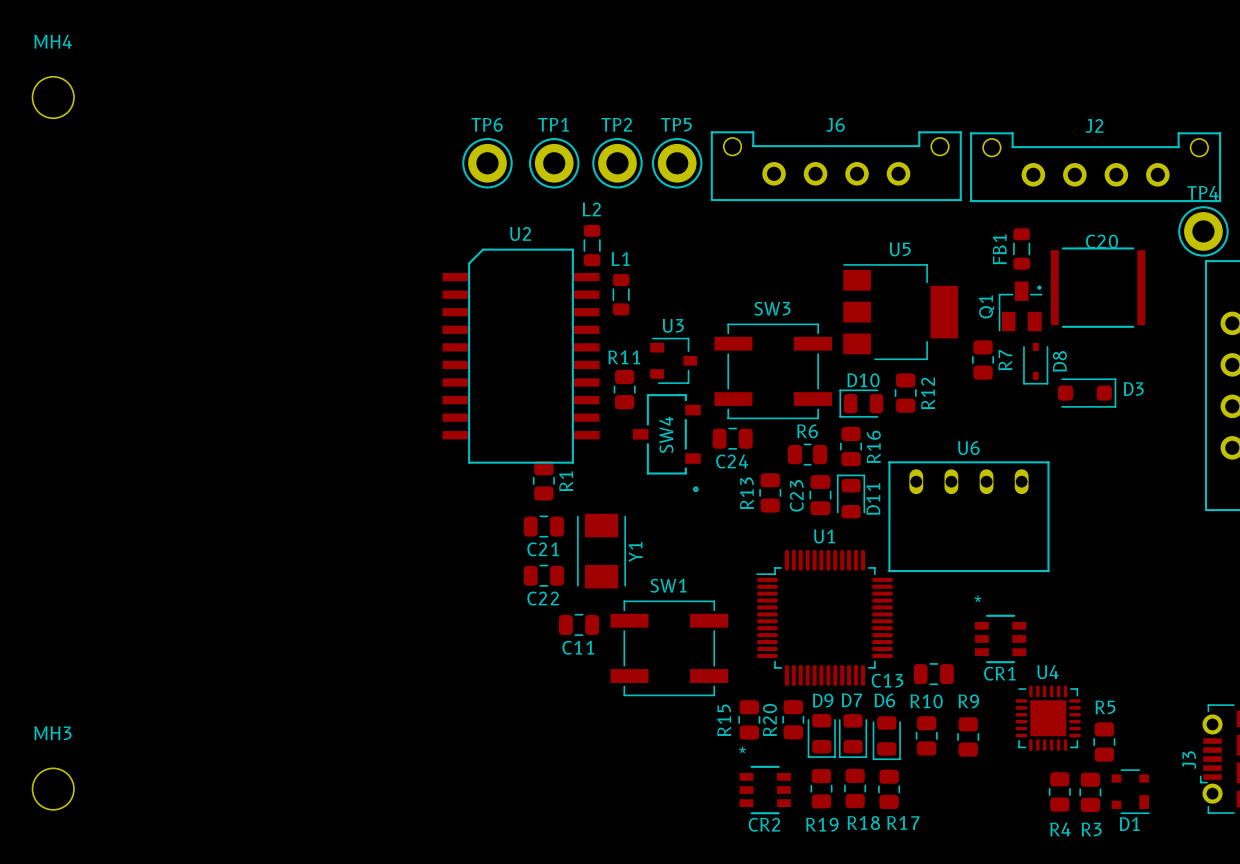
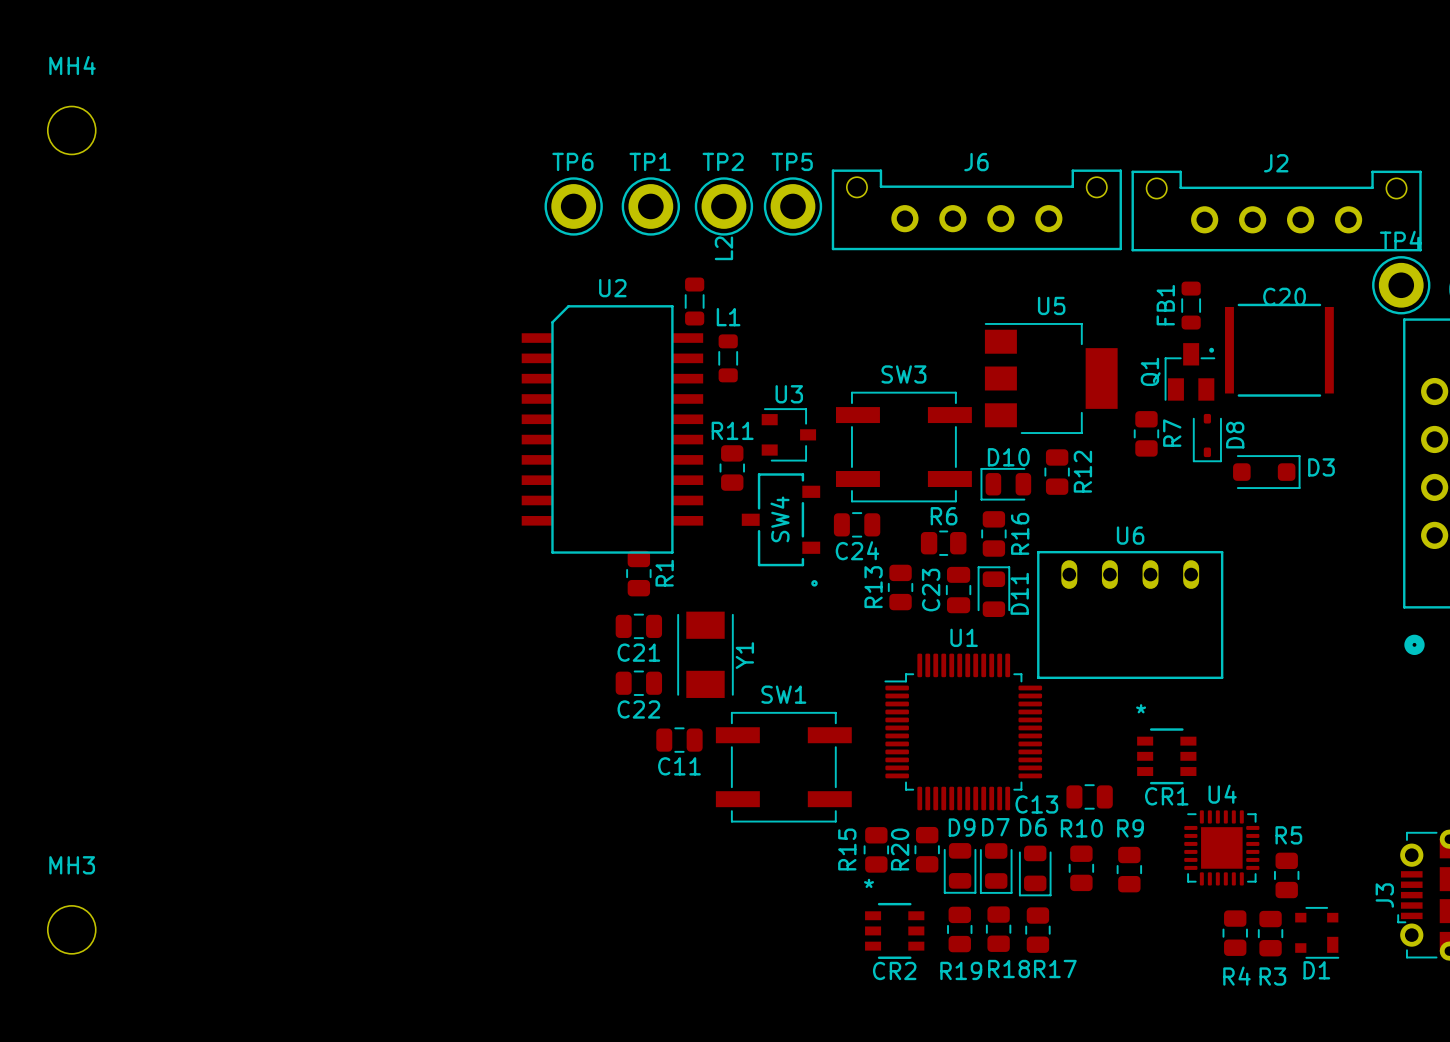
L2 name rotation: 0° (591, 209) -> 90° counterclockwise (723, 248)
part: none -> (1414, 644)

